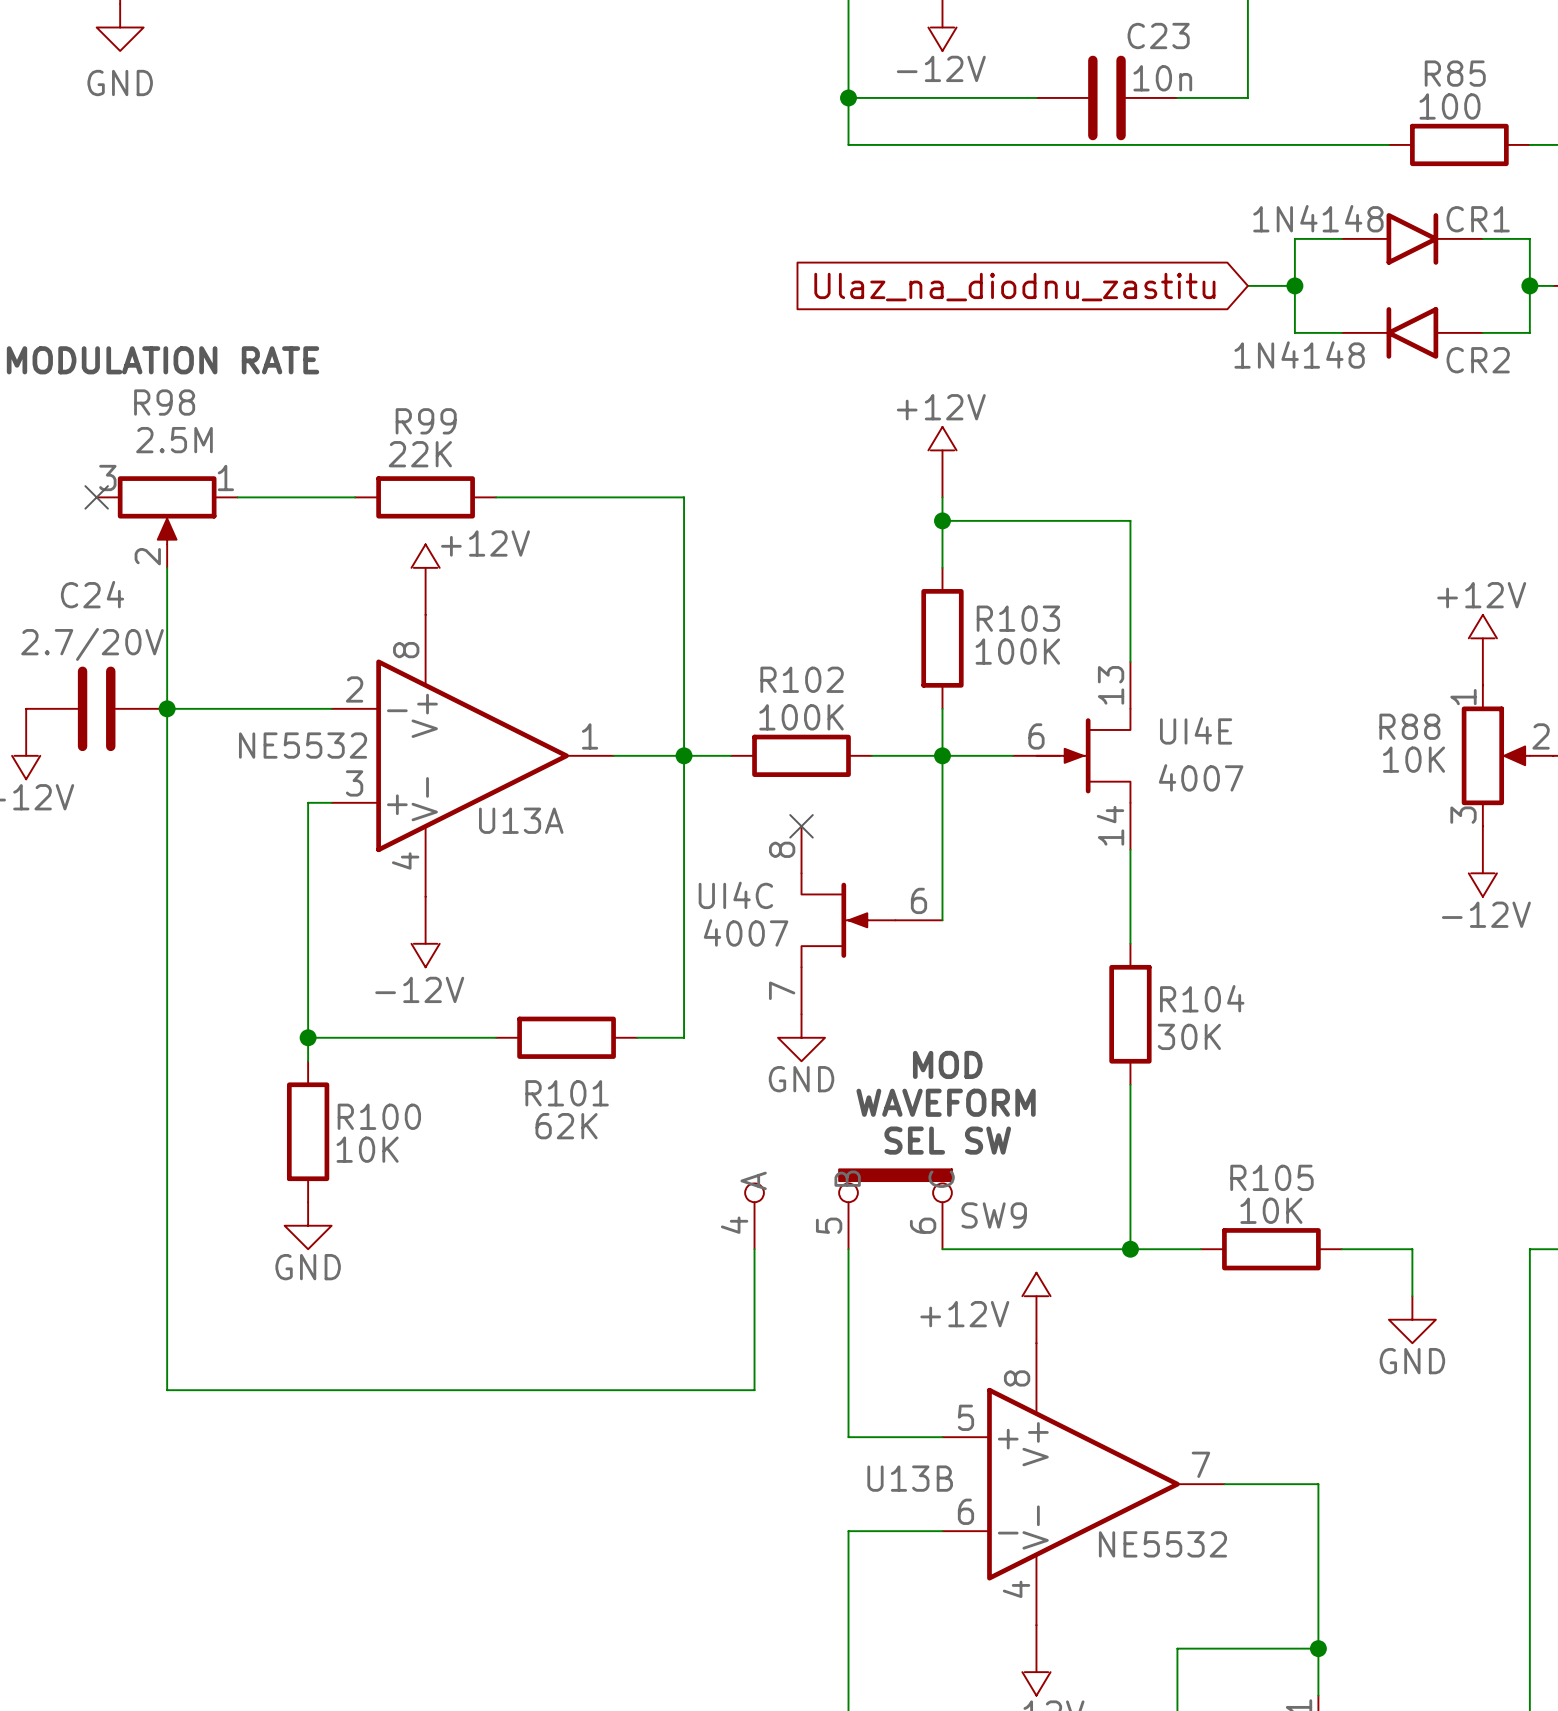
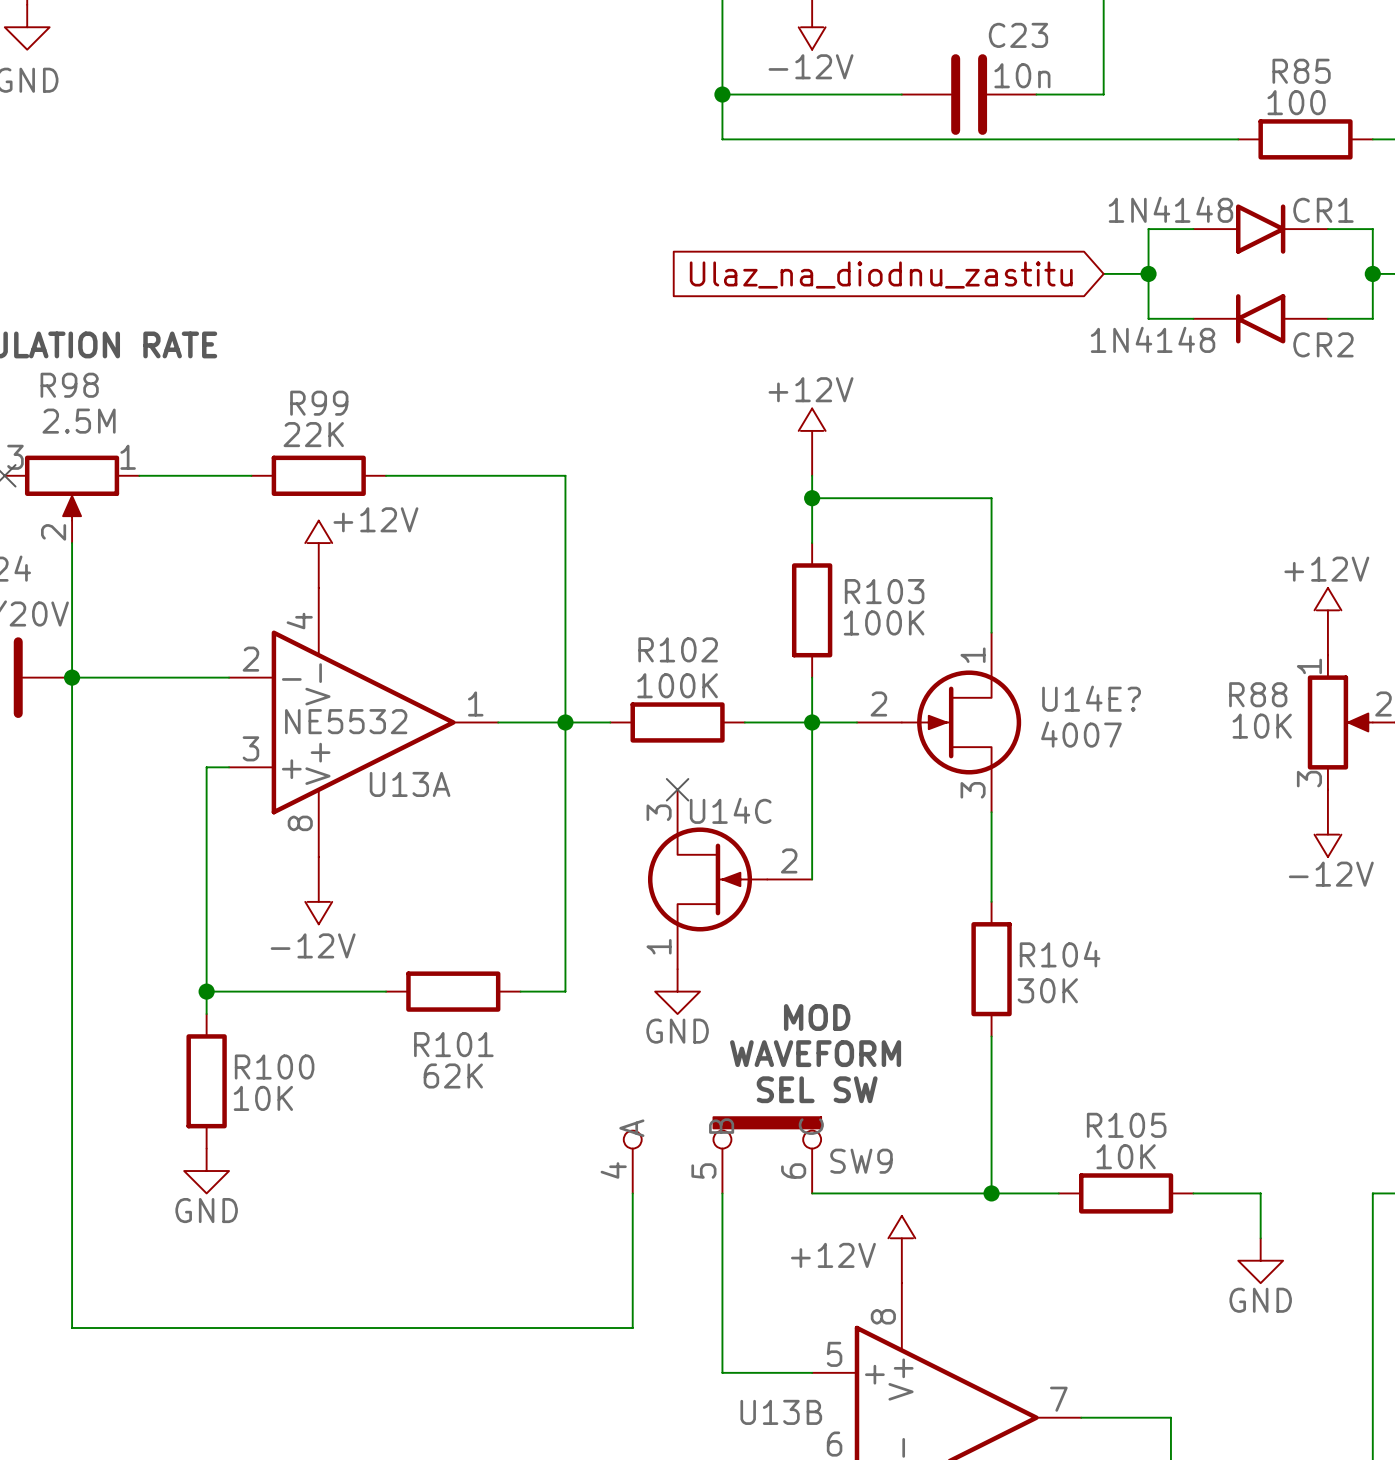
part value: NE5532 (303, 745) -> none
U13A value: none -> NE5532 (346, 721)
part rotation: 0° (425, 755) -> 180° (318, 722)
UI4E: 4007 (1071, 755) -> none
U14E?: none -> 4007 (939, 722)
U14C: none -> (730, 879)
UI4C: 4007 (872, 920) -> none

